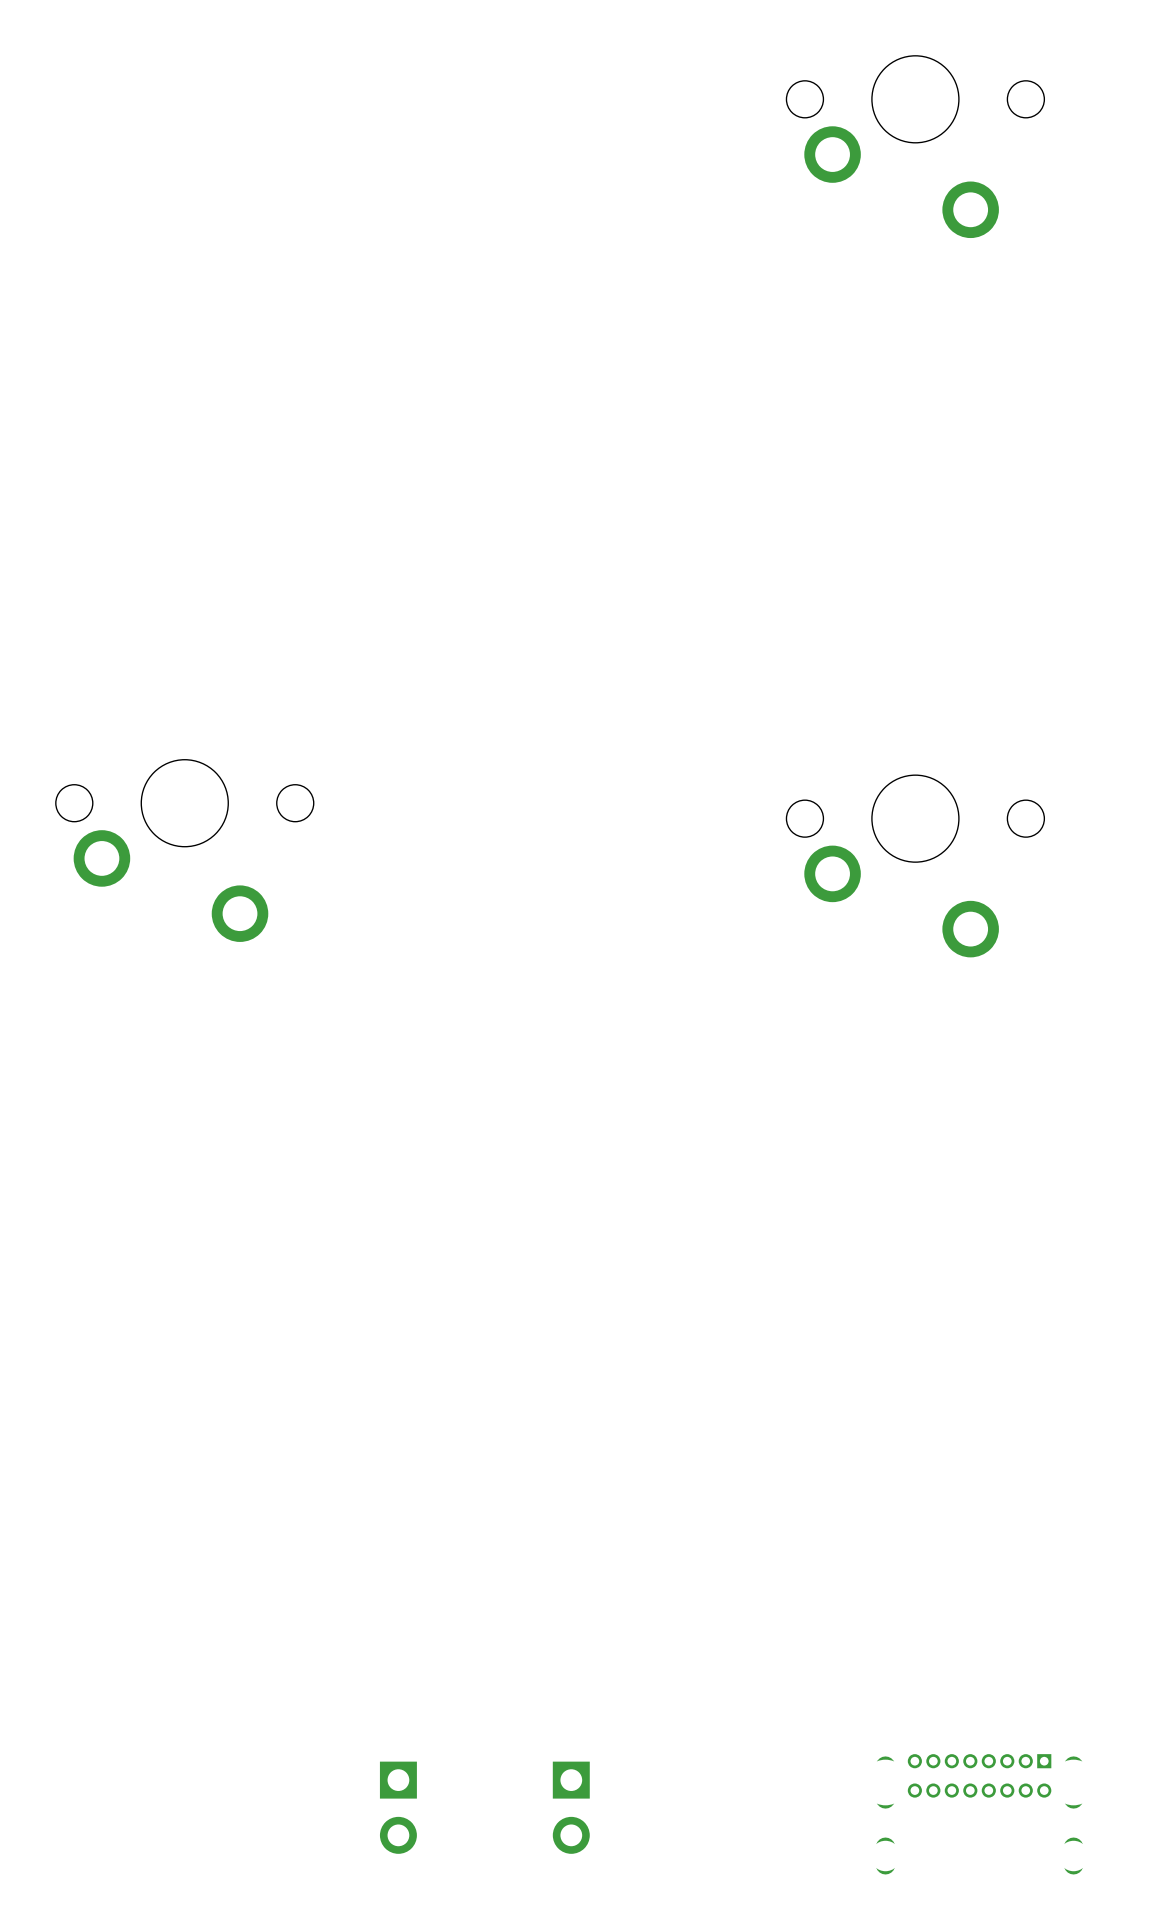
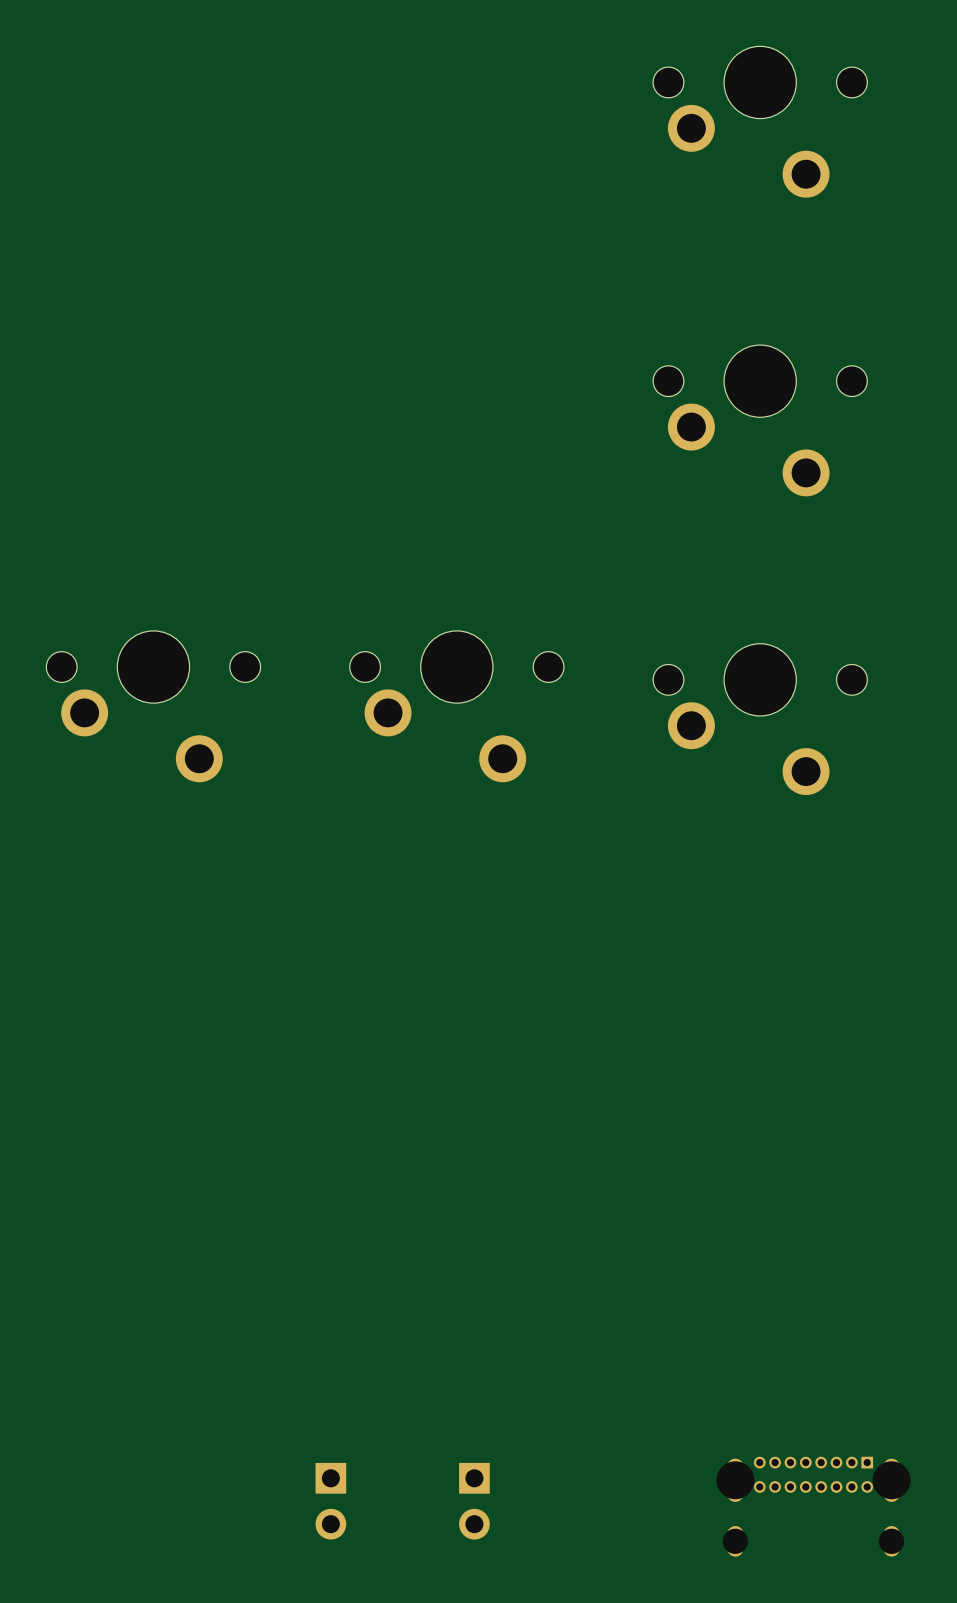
part: none -> (760, 420)
part: none -> (456, 706)

